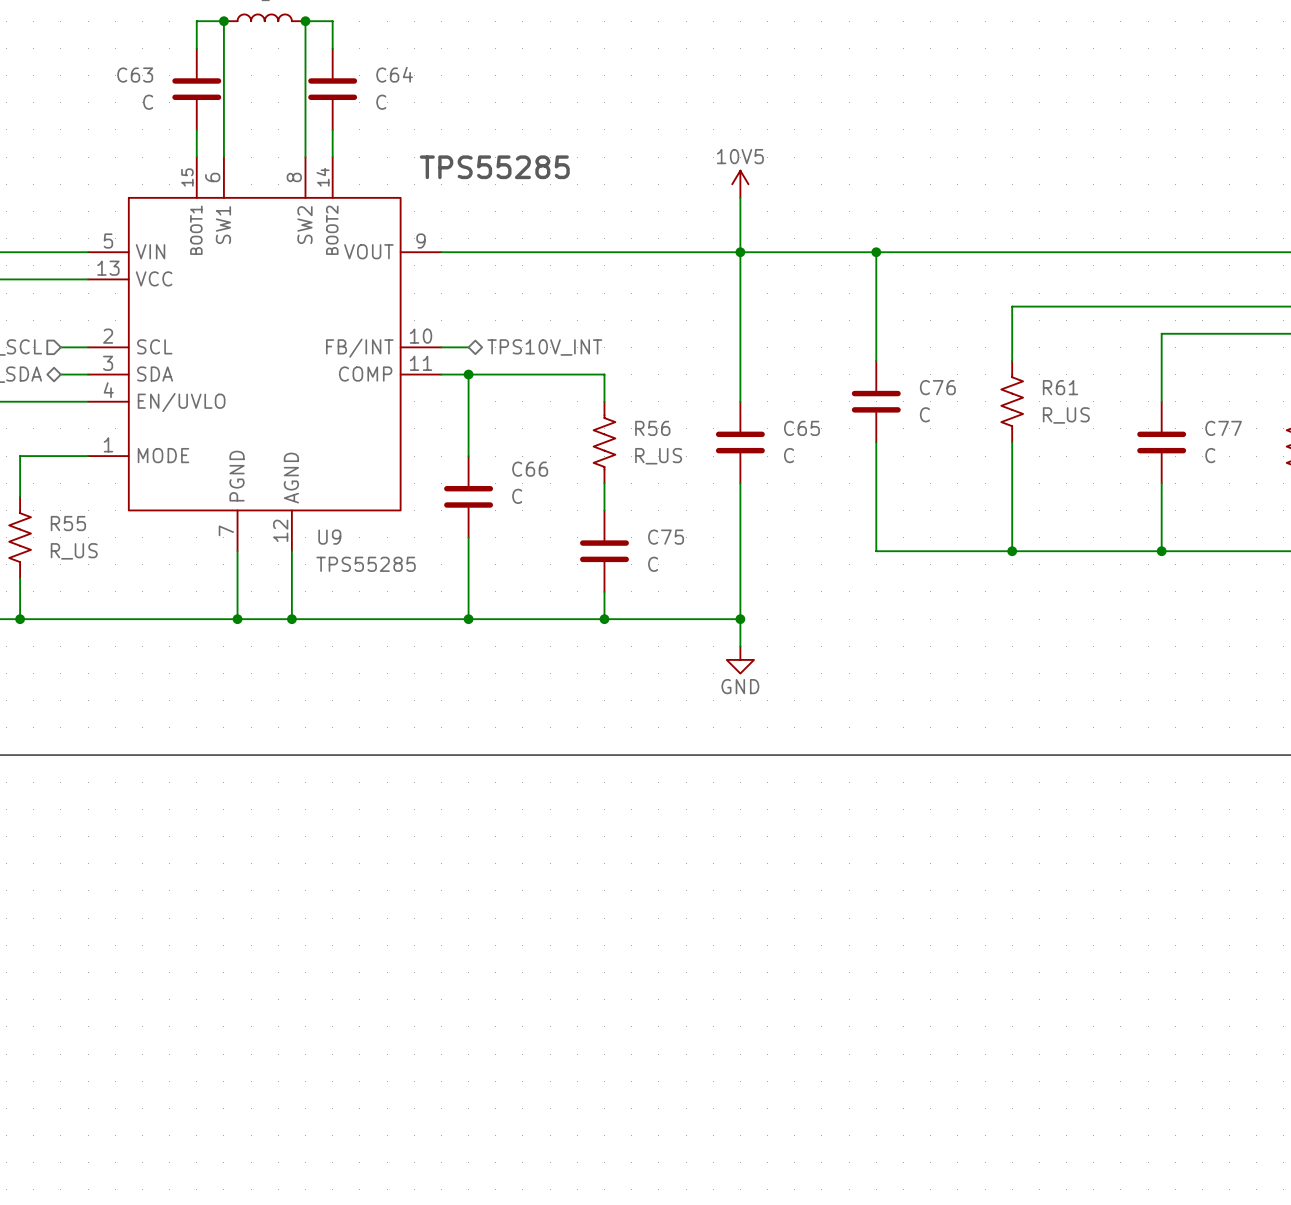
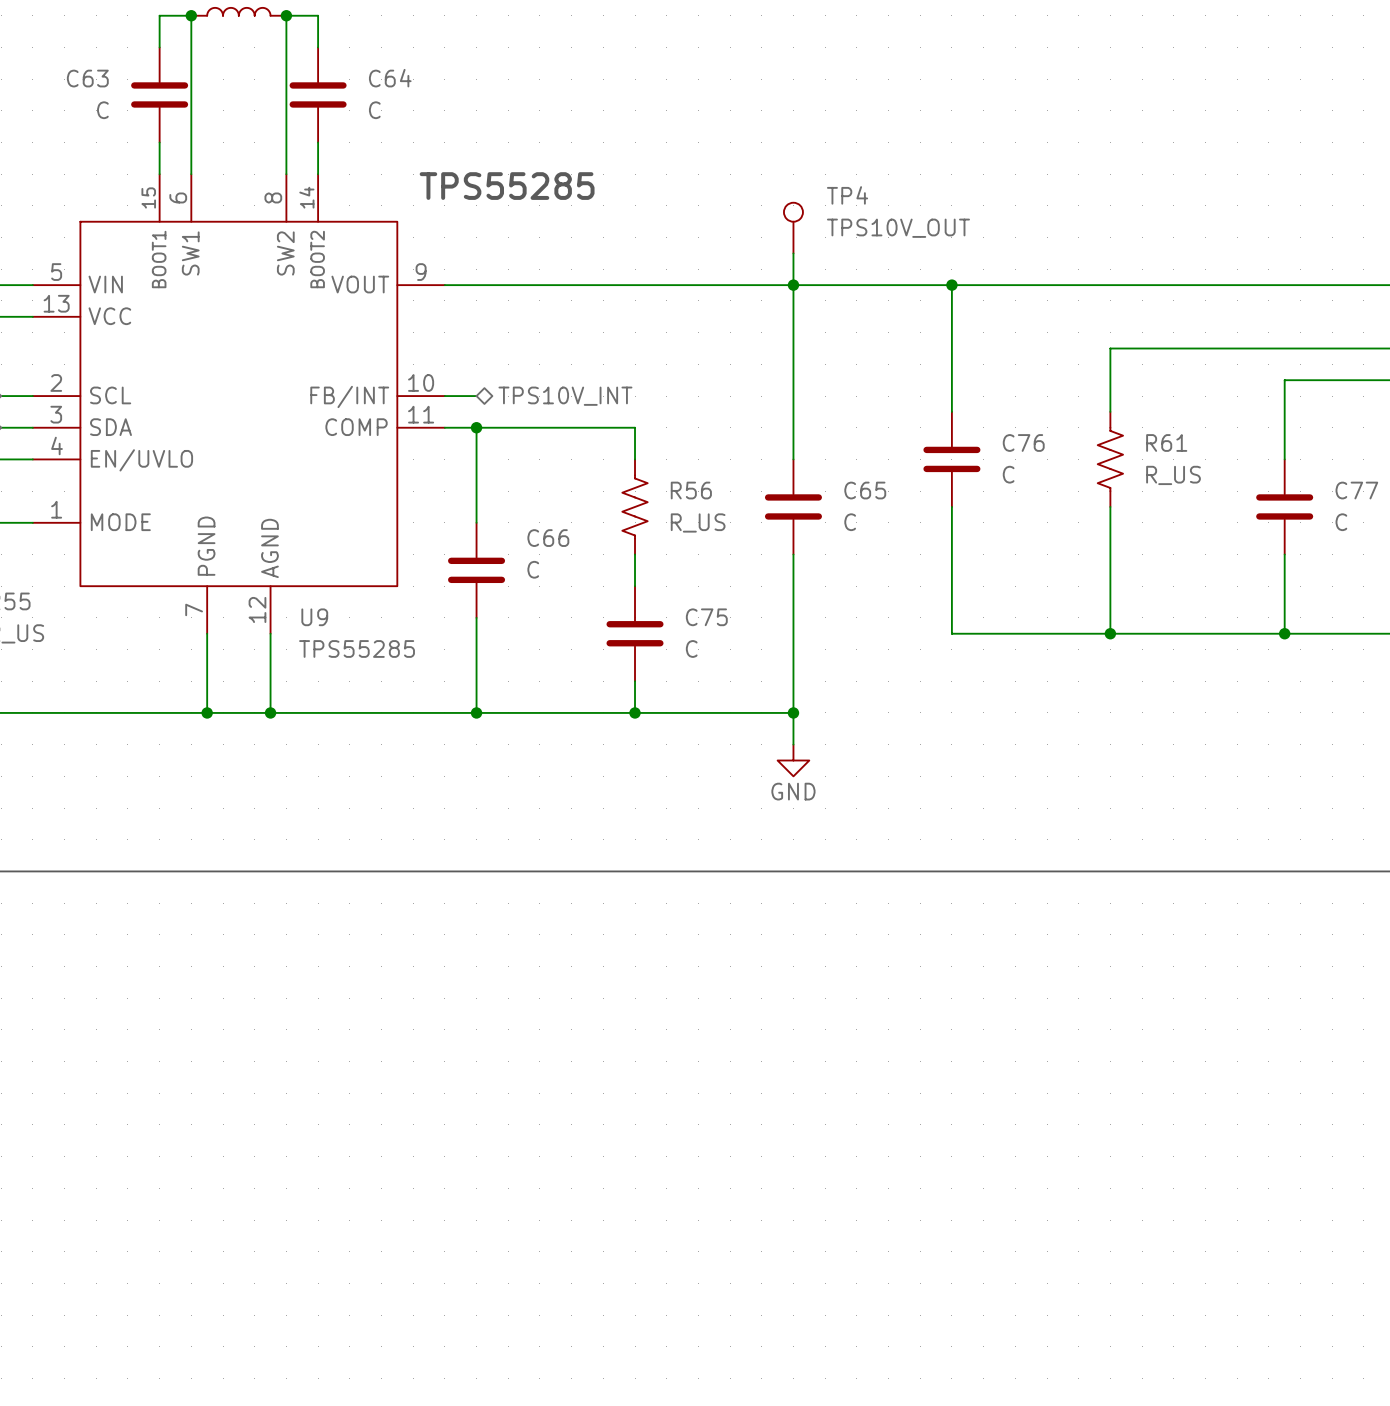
power symbol: 10V5 (740, 184) -> none
TP4: none -> TPS10V_OUT (793, 228)

